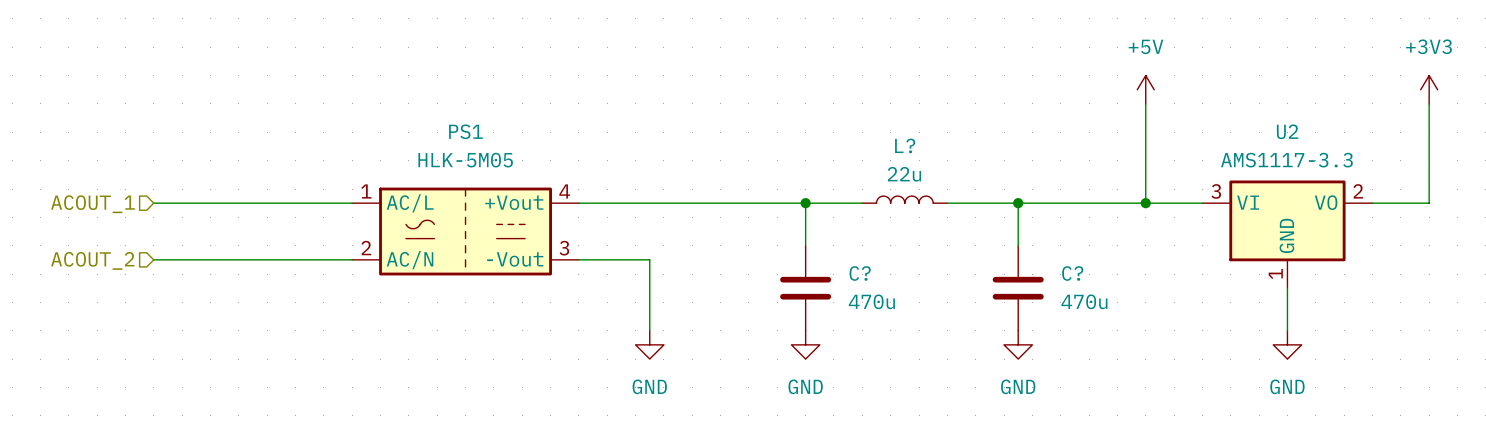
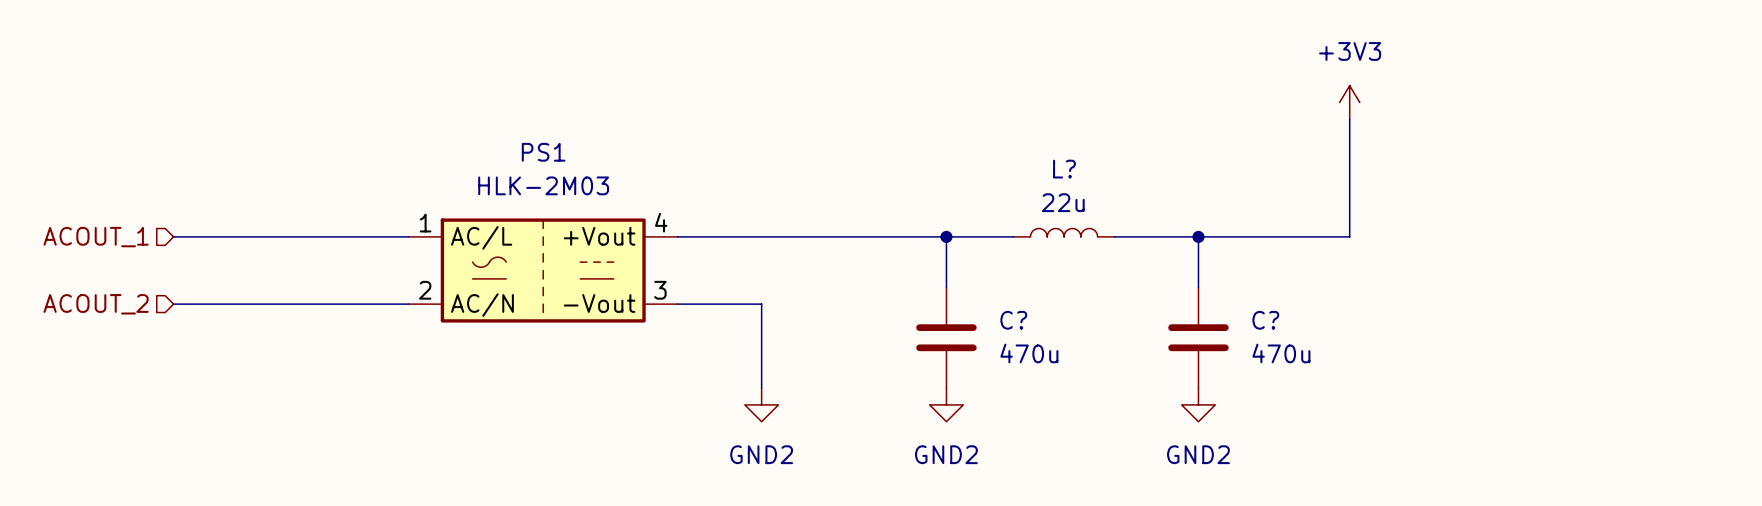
power symbol: +5V (1145, 89) -> +3V3 (1349, 102)
power symbol: +3V3 (1429, 89) -> none
wire: (1429, 103) (1429, 203) (1372, 203) -> none
PS1 value: HLK-5M05 (465, 160) -> HLK-2M03 (543, 185)
wire: (1145, 203) (1202, 203) -> none
junction: (1145, 203) -> none
U2: AMS1117-3.3 (1287, 234) -> none
wire: (1287, 288) (1287, 330) -> none
power symbol: GND (649, 344) -> GND2 (761, 404)
power symbol: GND (805, 344) -> GND2 (946, 404)
power symbol: GND (1018, 344) -> GND2 (1198, 404)
power symbol: GND (1287, 344) -> none

